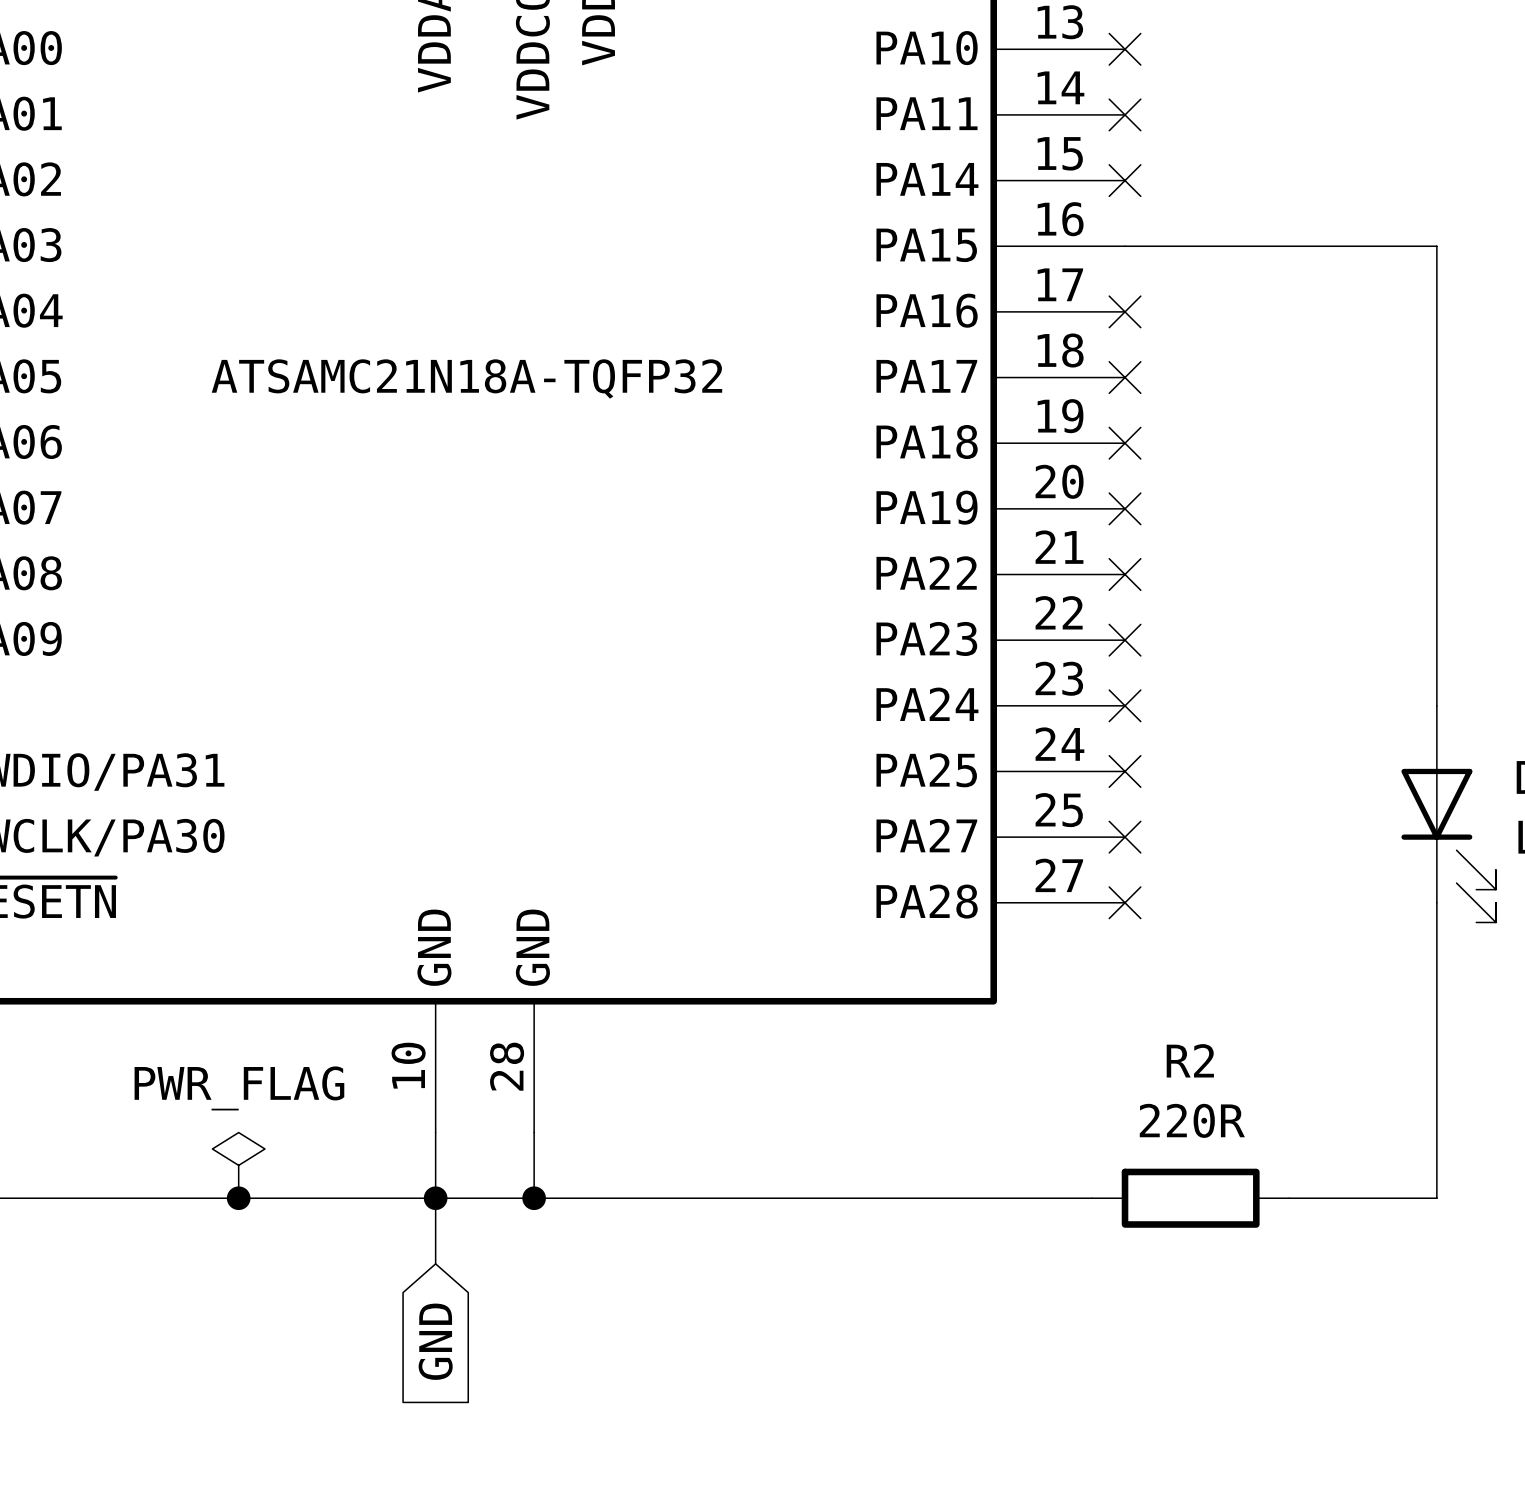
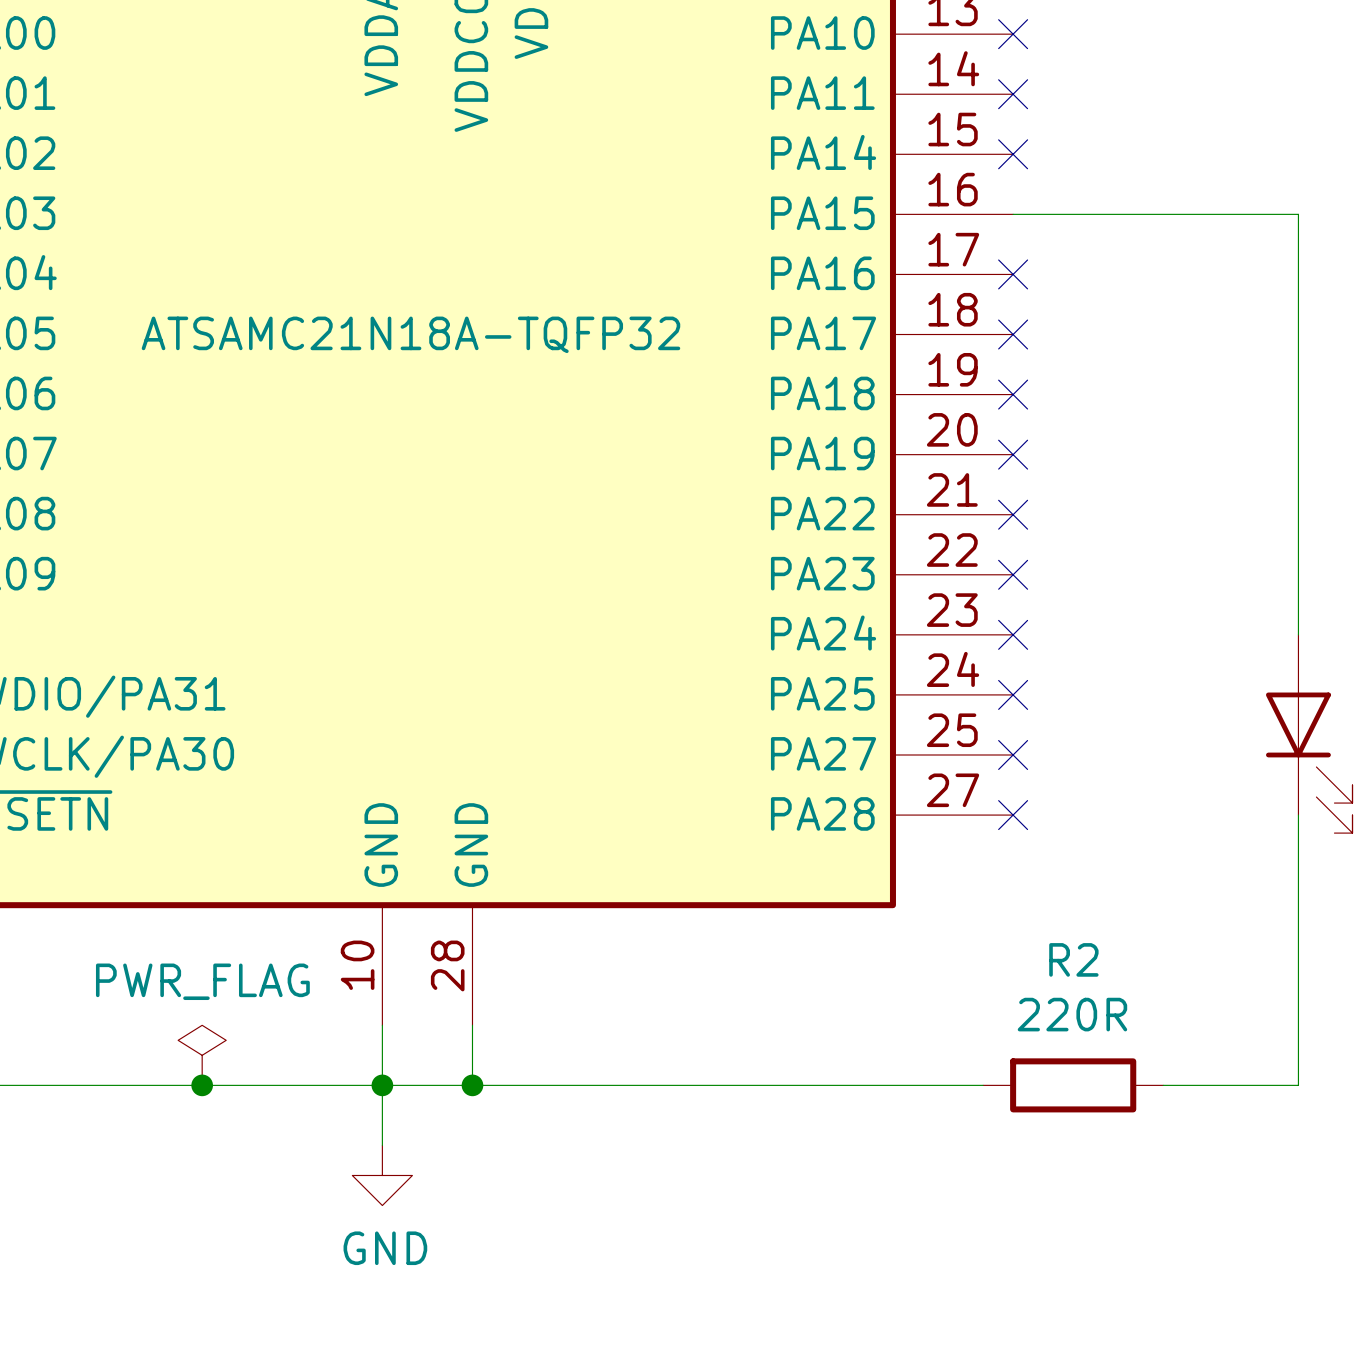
power symbol: none -> GND (382, 1175)
global label: GND (435, 1341) -> none

